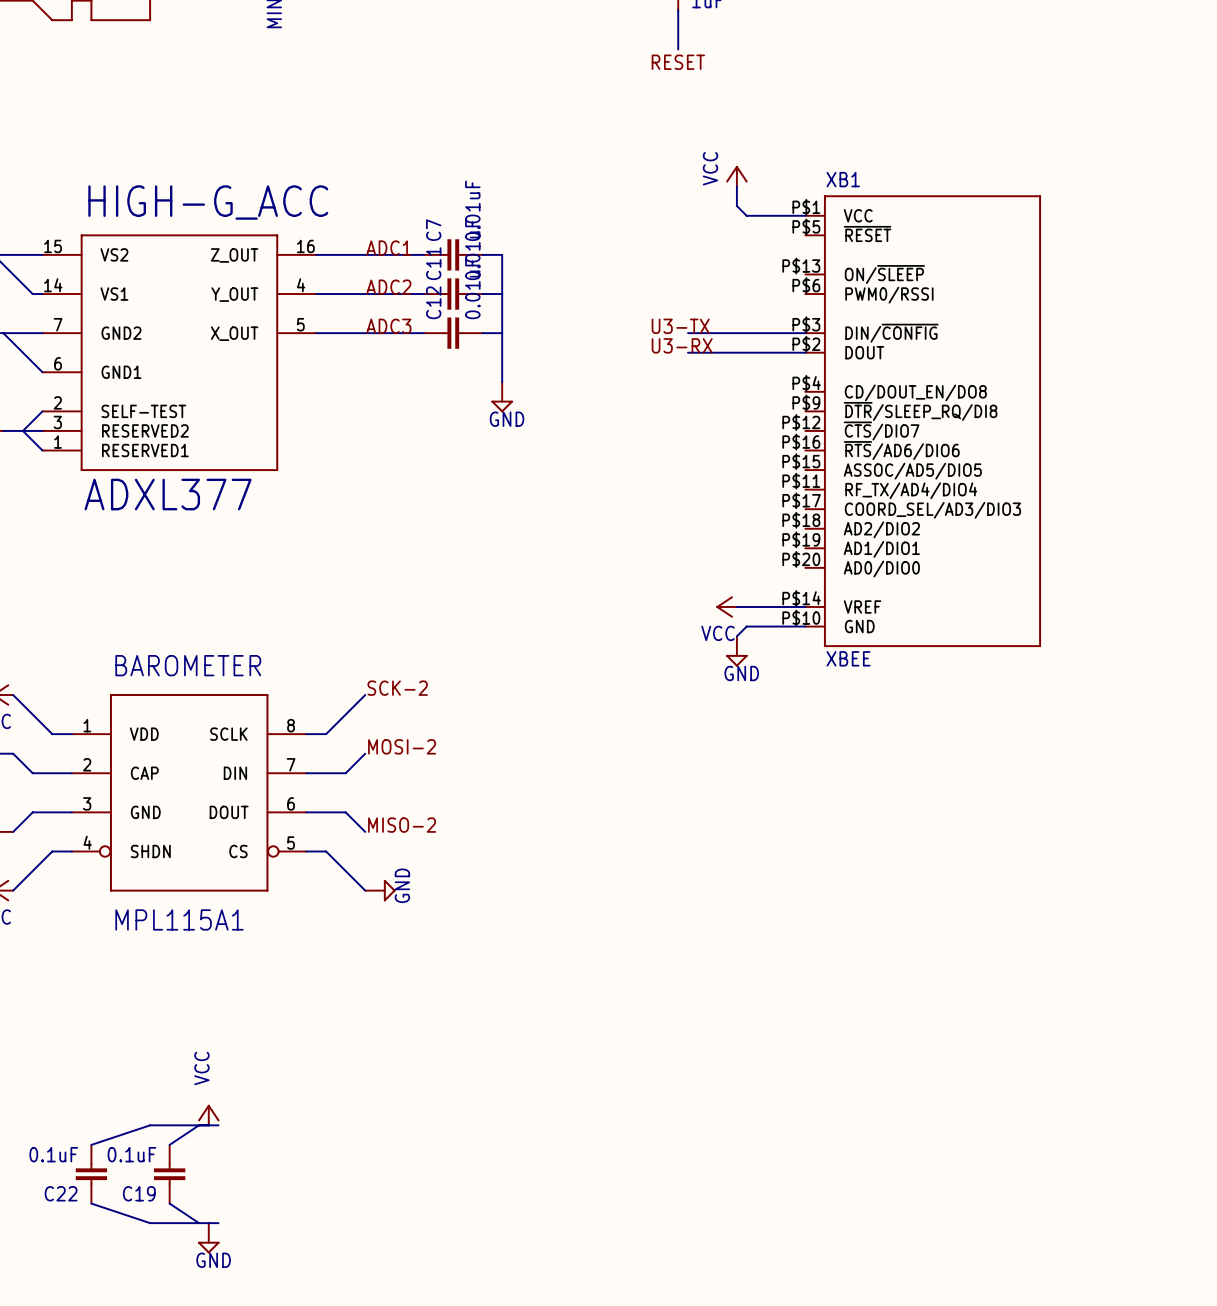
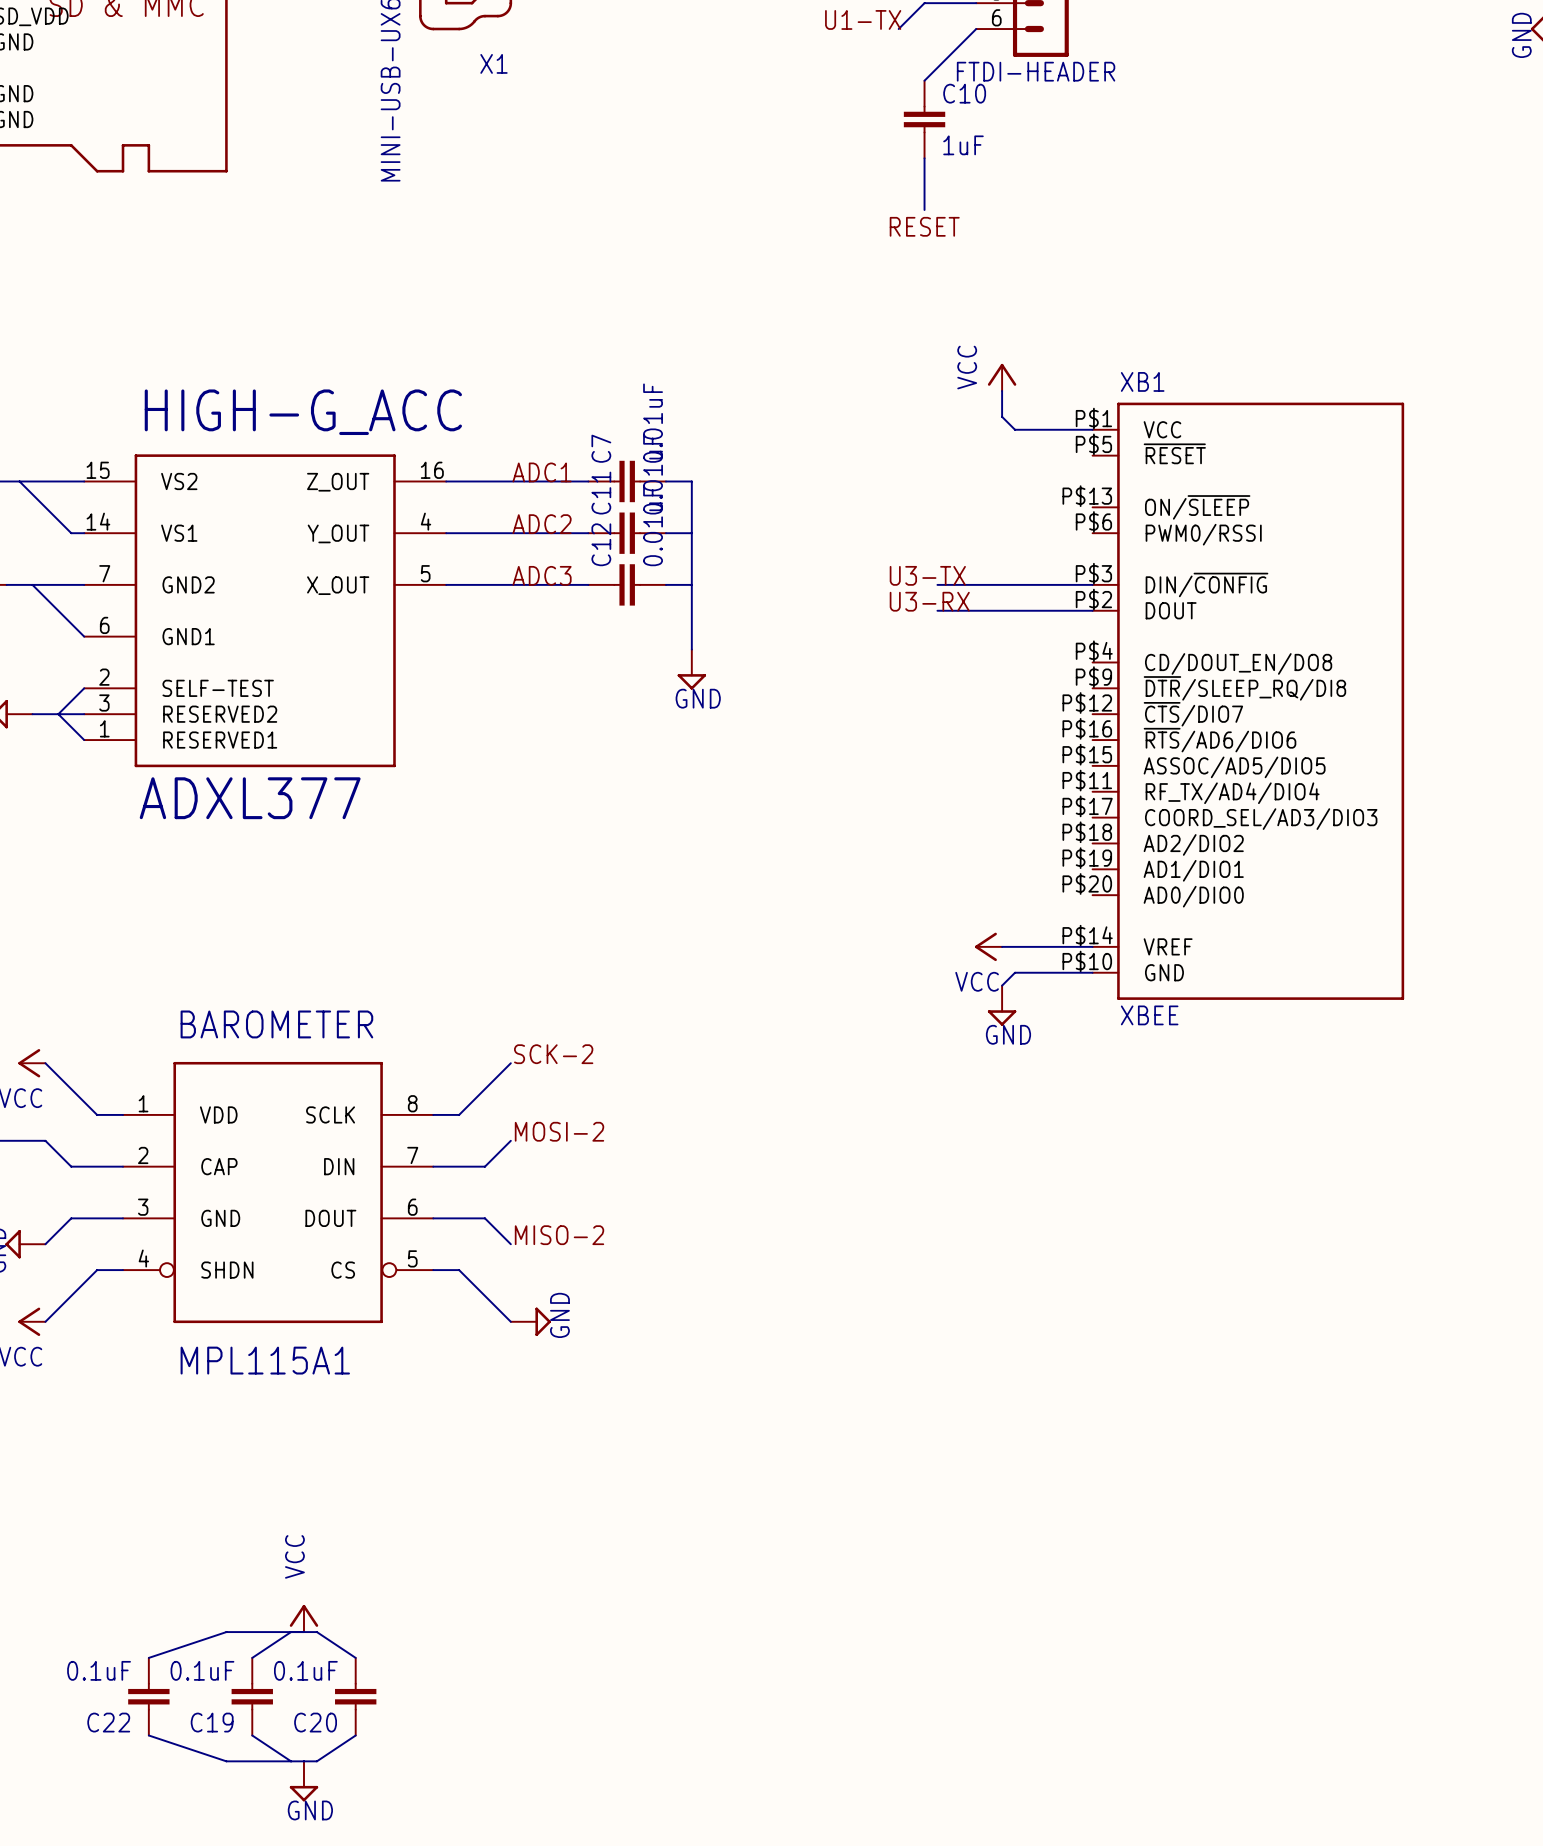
wire: none -> (316, 1632) (355, 1657)
C20: none -> 0.1uF (355, 1696)
wire: none -> (355, 1735) (316, 1761)

